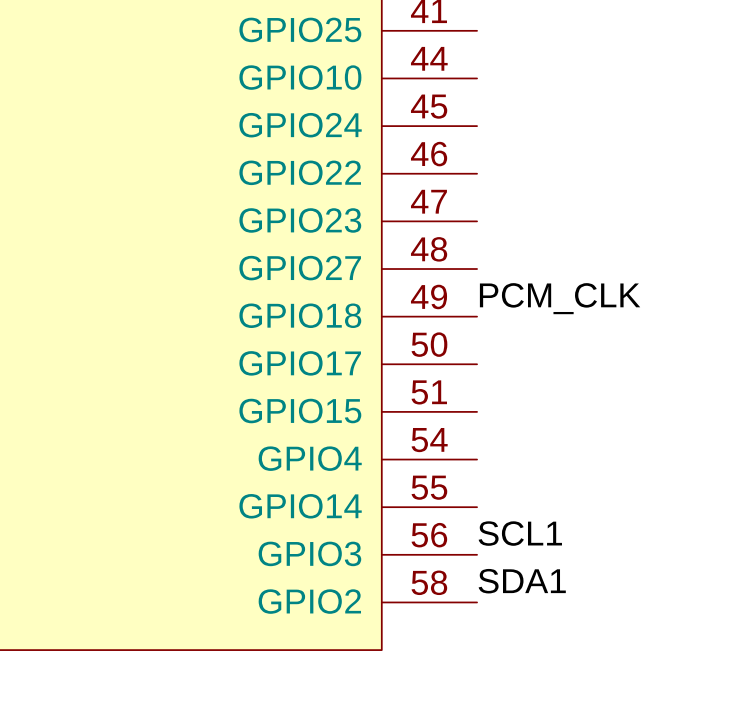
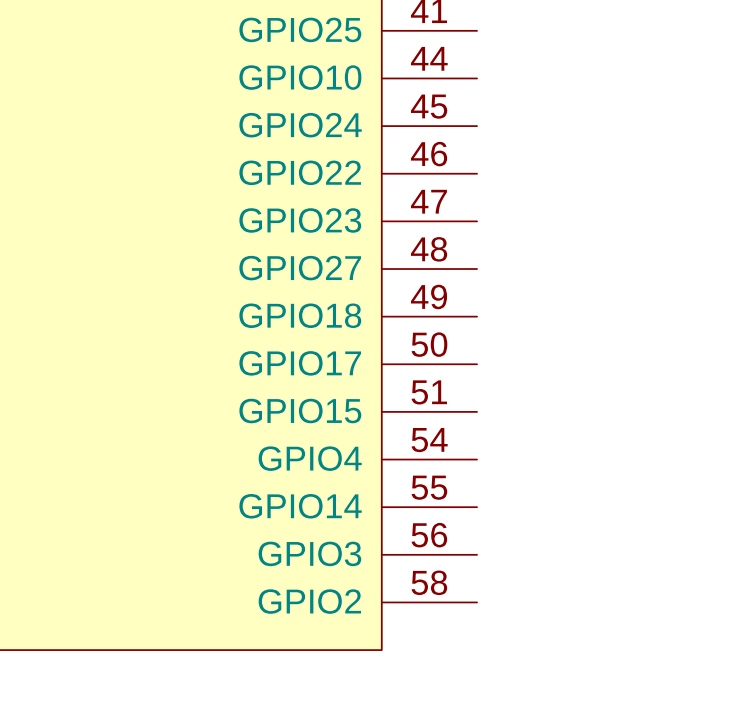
label: PCM_CLK (560, 298) -> none
label: SCL1 (520, 533) -> none
label: SDA1 (522, 581) -> none

